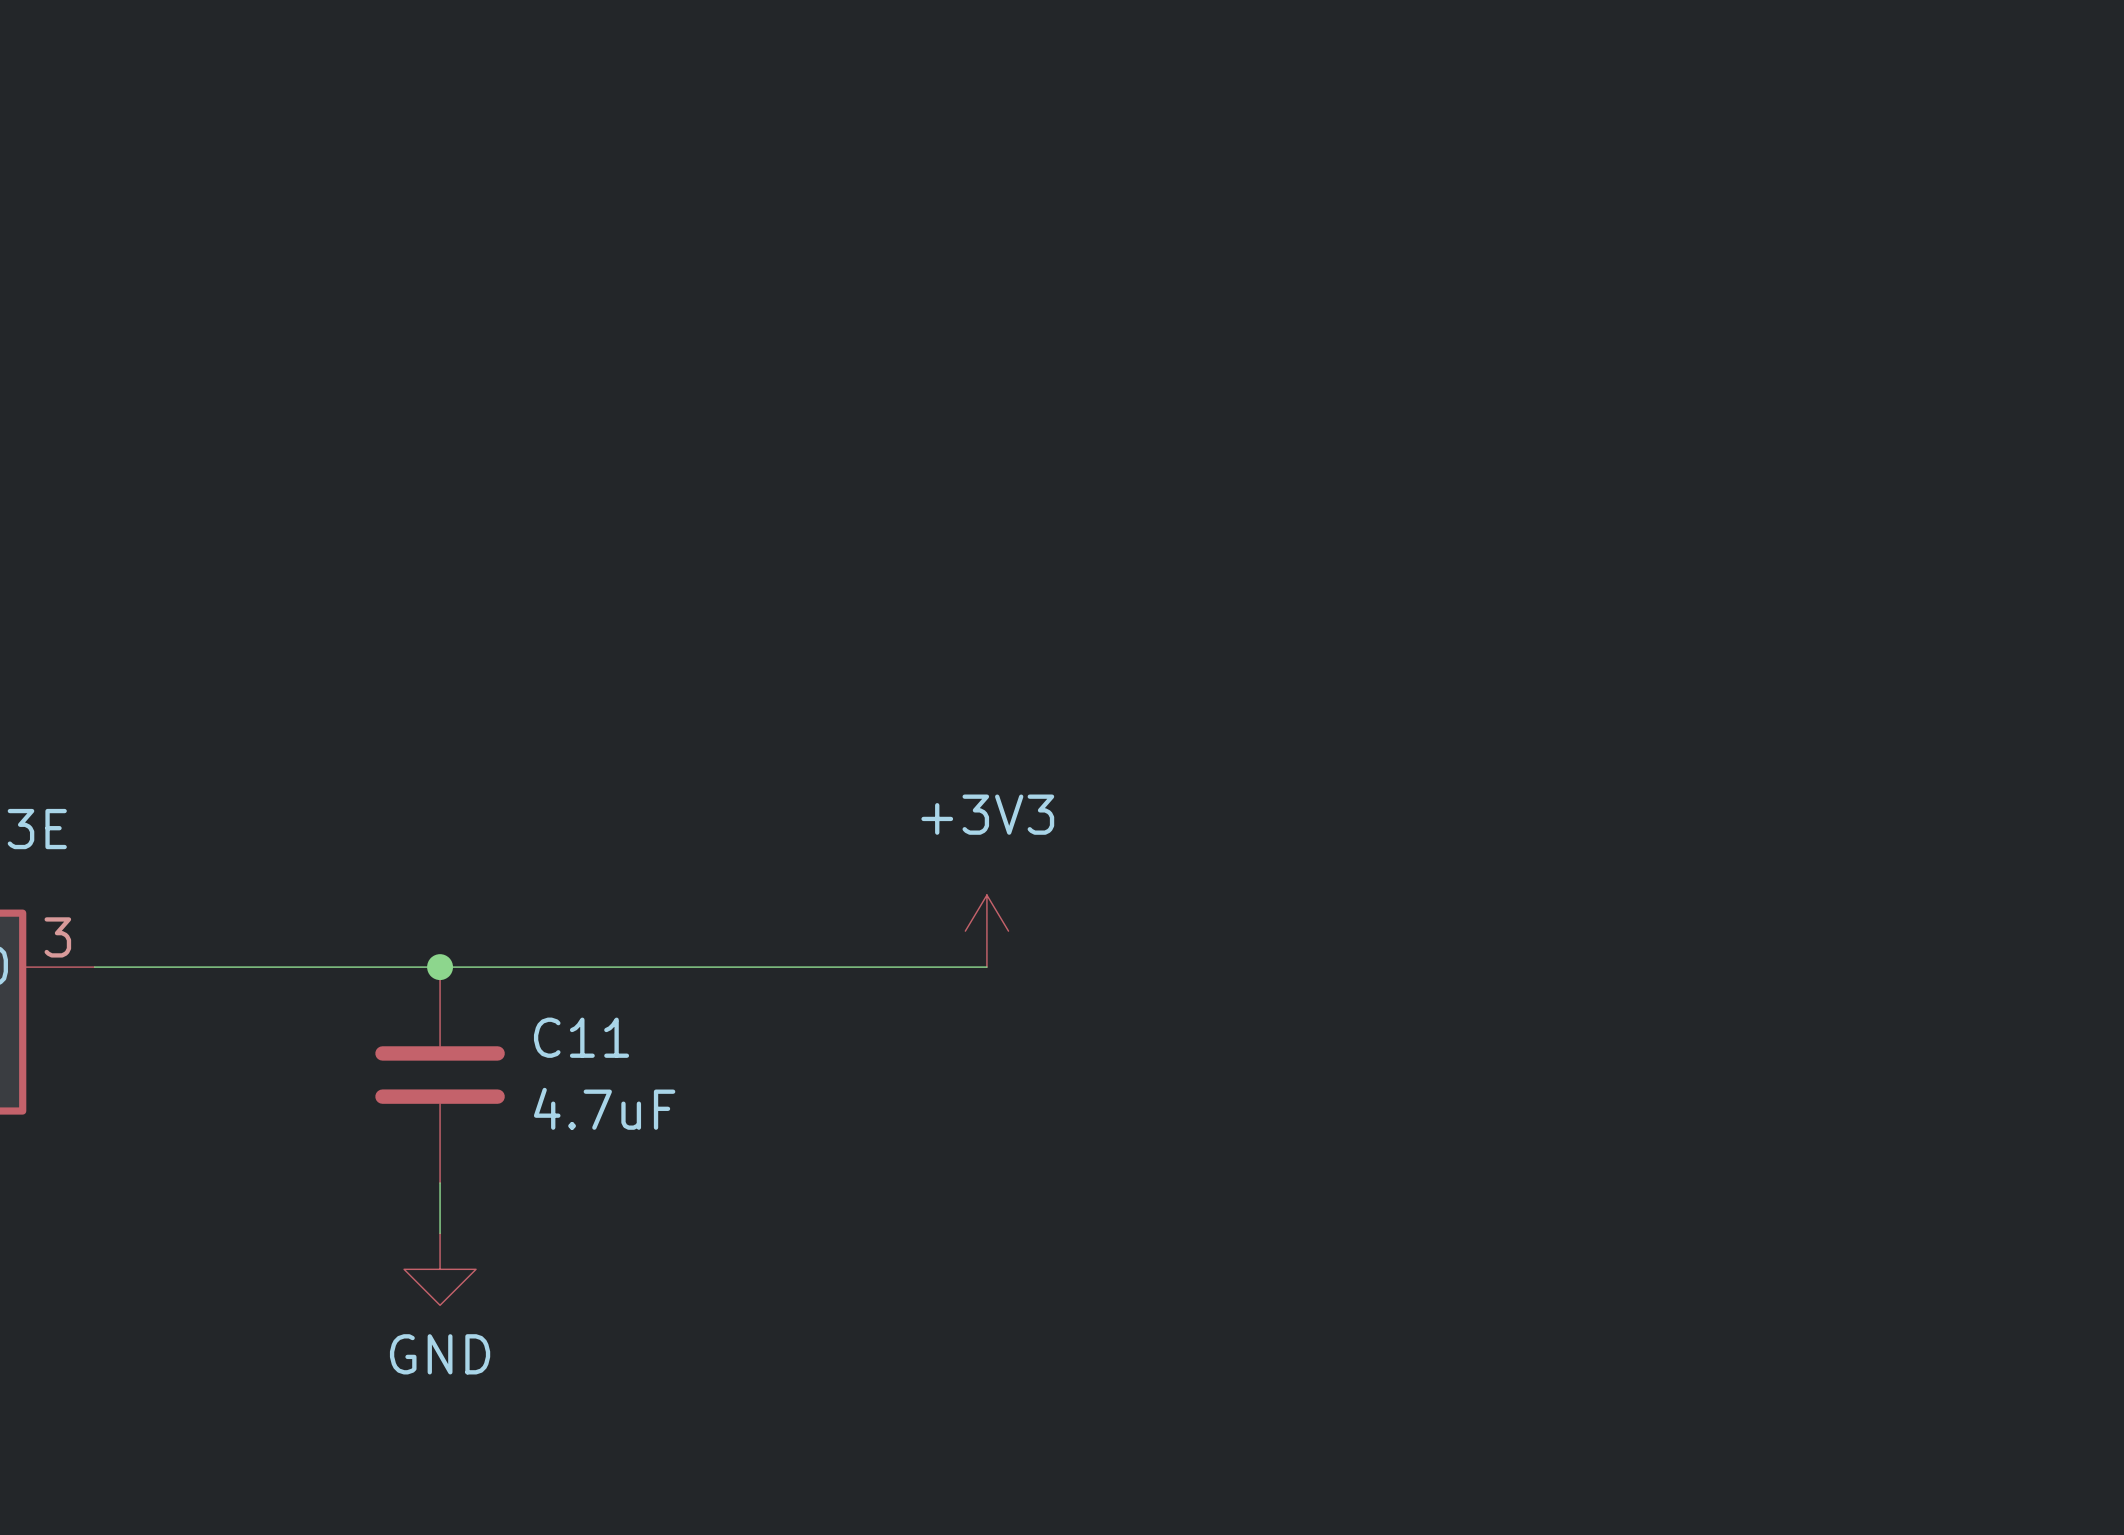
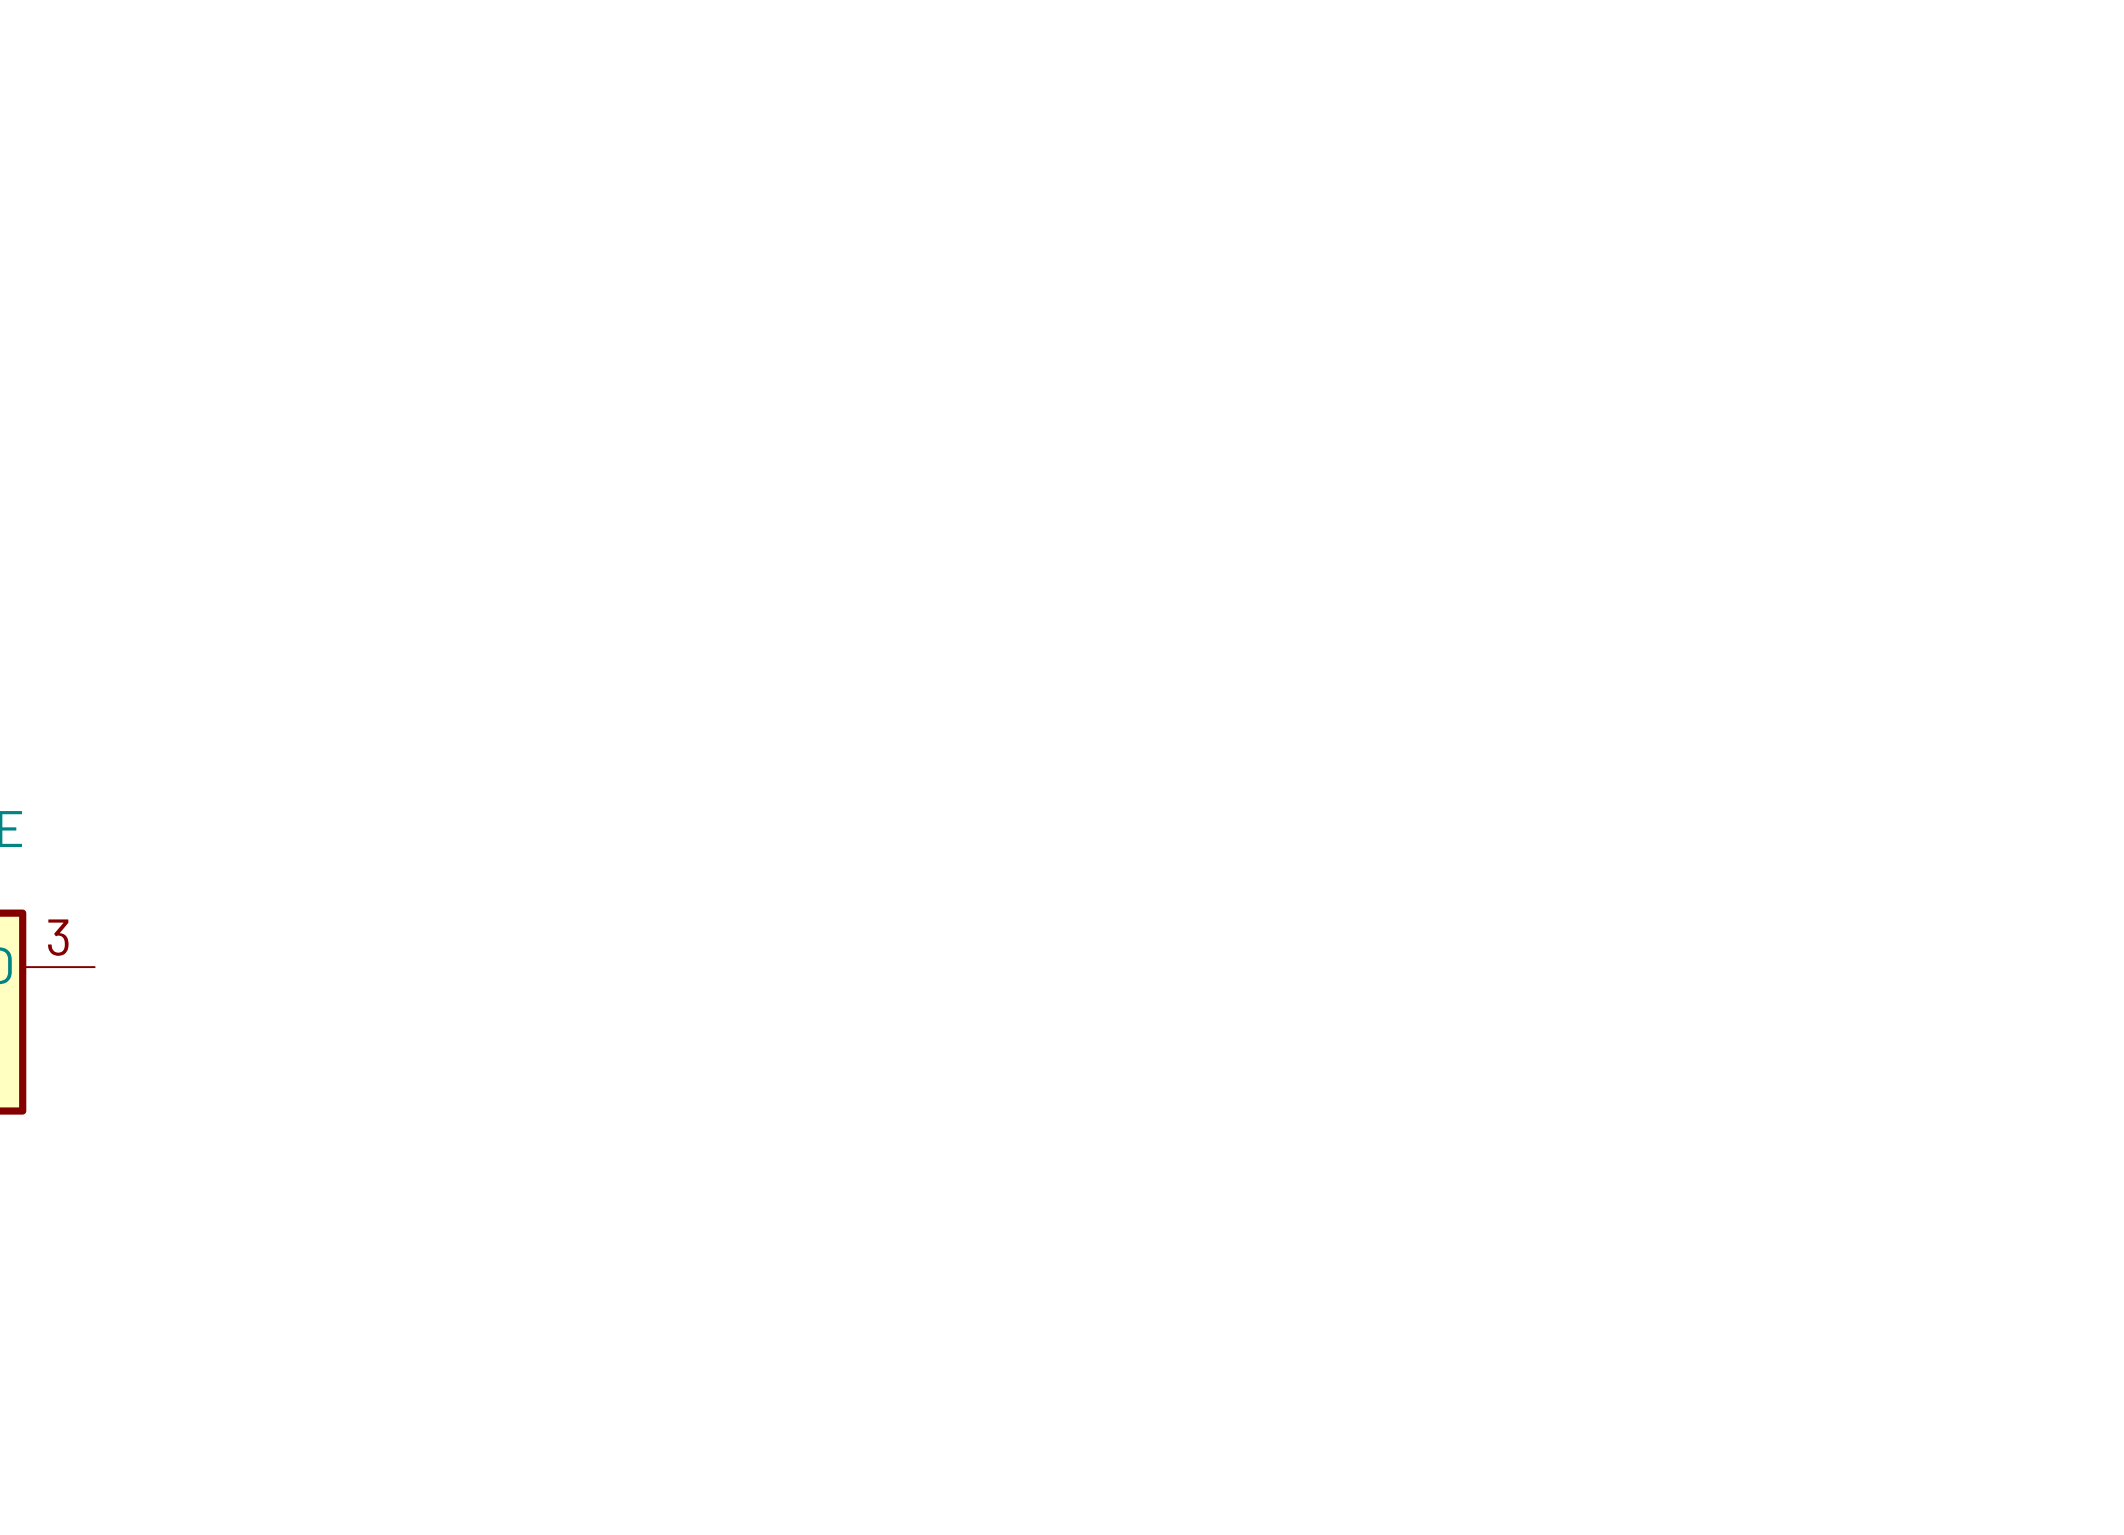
power symbol: +3V3 (986, 931) -> none
wire: (94, 967) (986, 967) -> none
junction: (440, 967) -> none
C11: 4.7uF (440, 1075) -> none
wire: (440, 1182) (440, 1233) -> none
power symbol: GND (440, 1269) -> none

